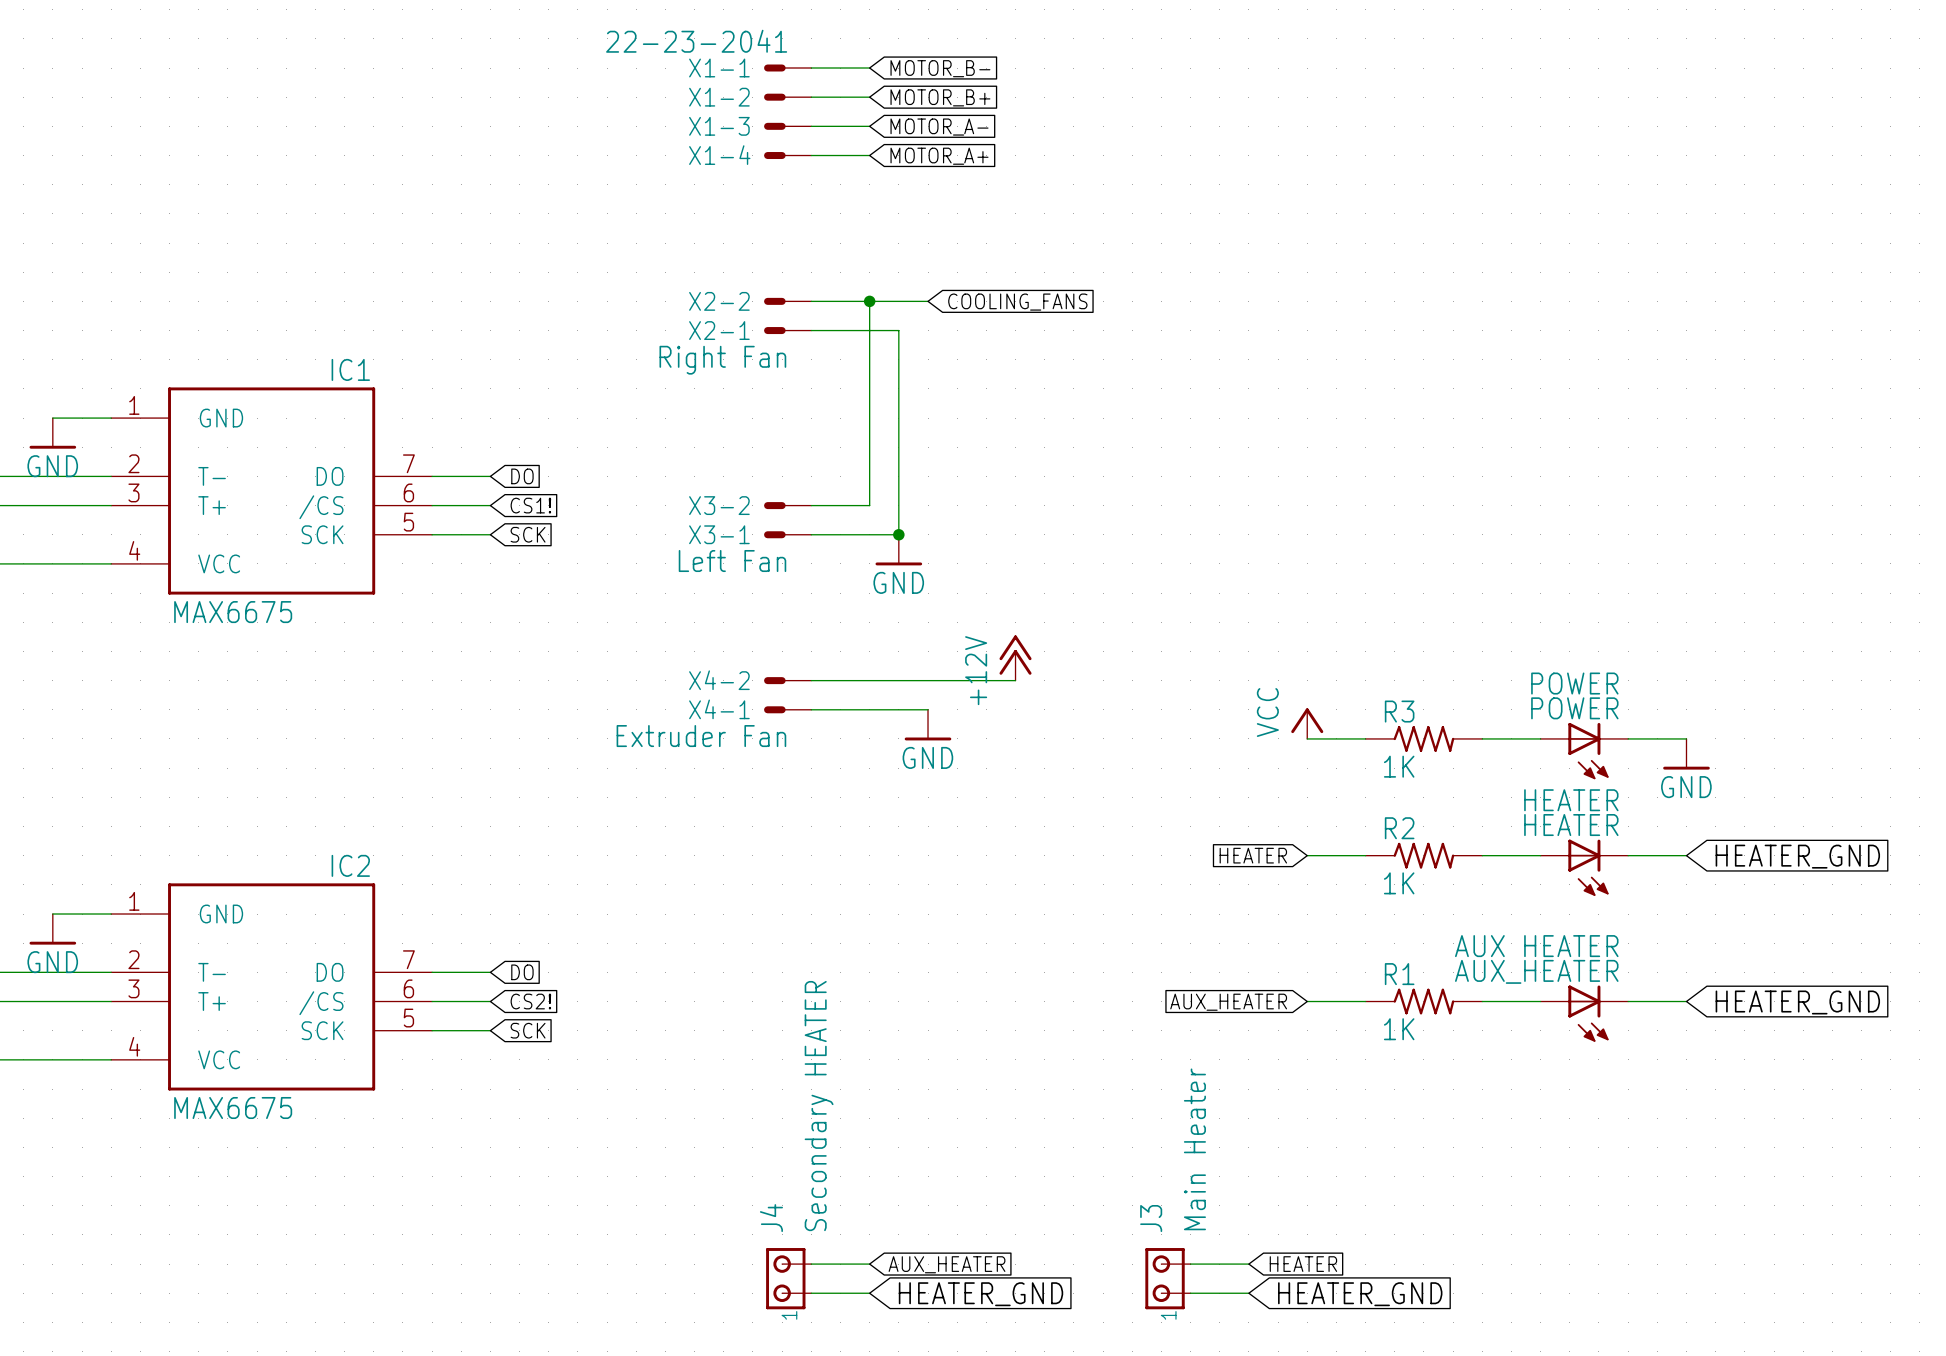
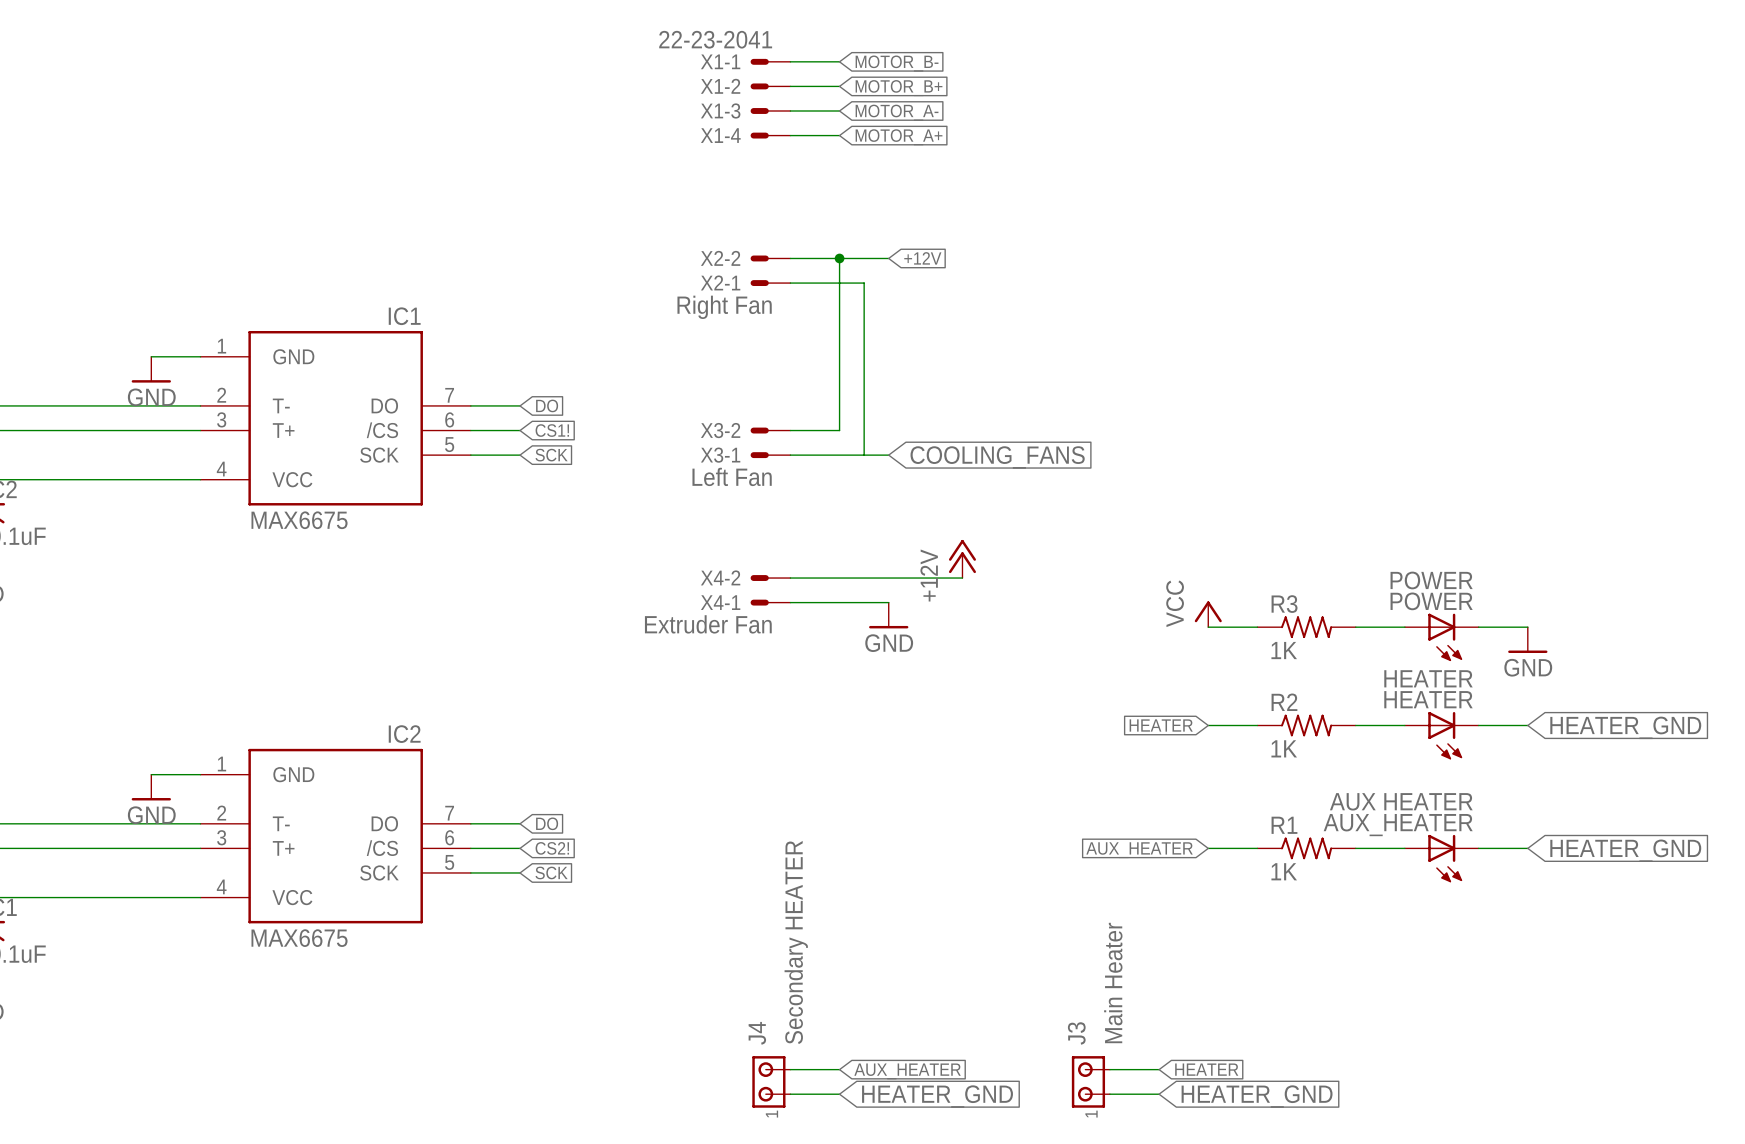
global label: COOLING_FANS (1017, 302) -> +12V (922, 258)
wire: none -> (864, 455) (888, 455)
junction: (898, 534) -> none
global label: none -> COOLING_FANS (997, 457)
power symbol: GND (898, 550) -> none

